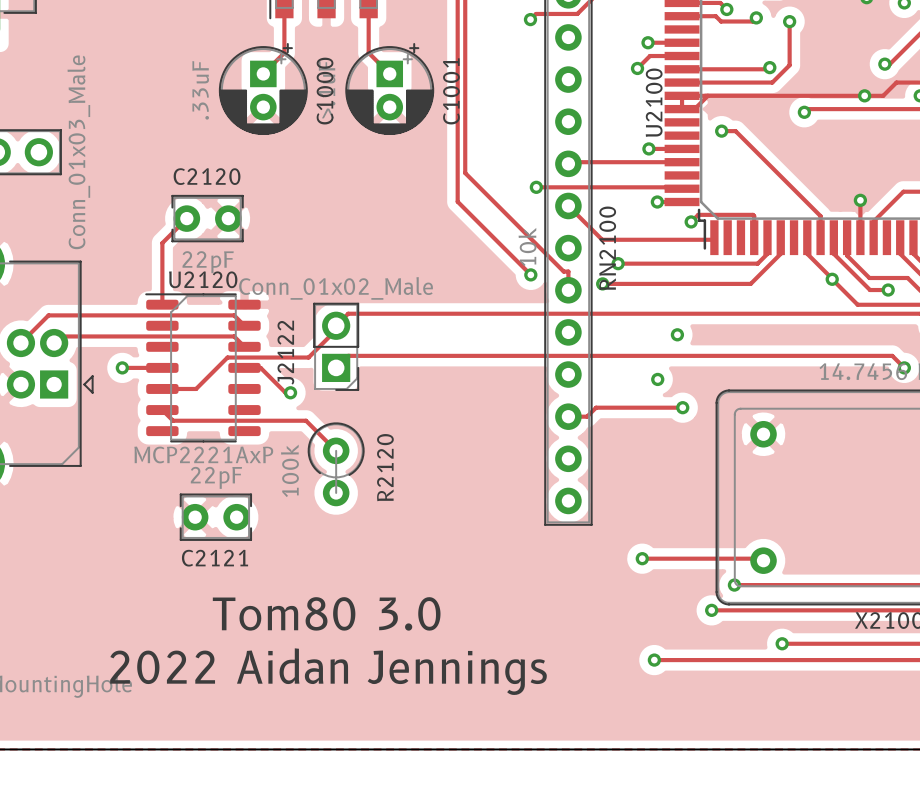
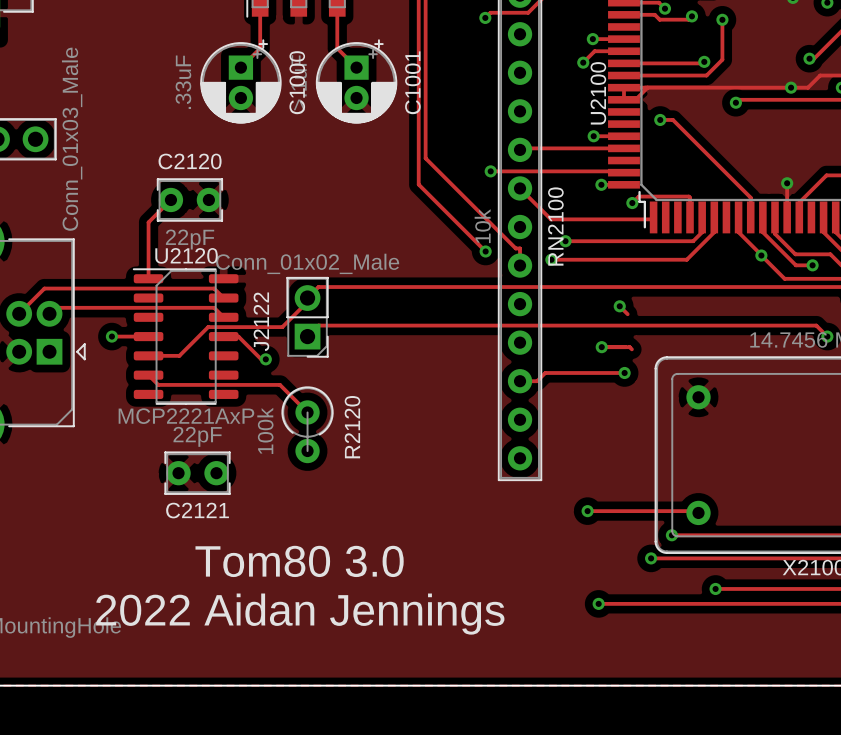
track: none -> (619, 306) (627, 314)
track: none -> (601, 347) (629, 347) (631, 349)

